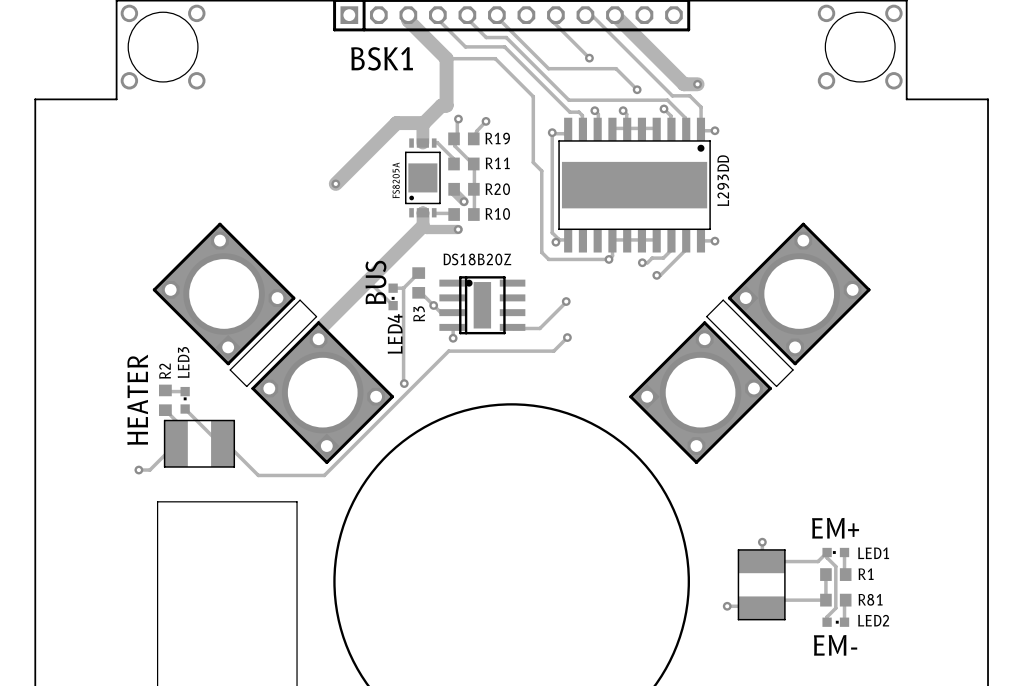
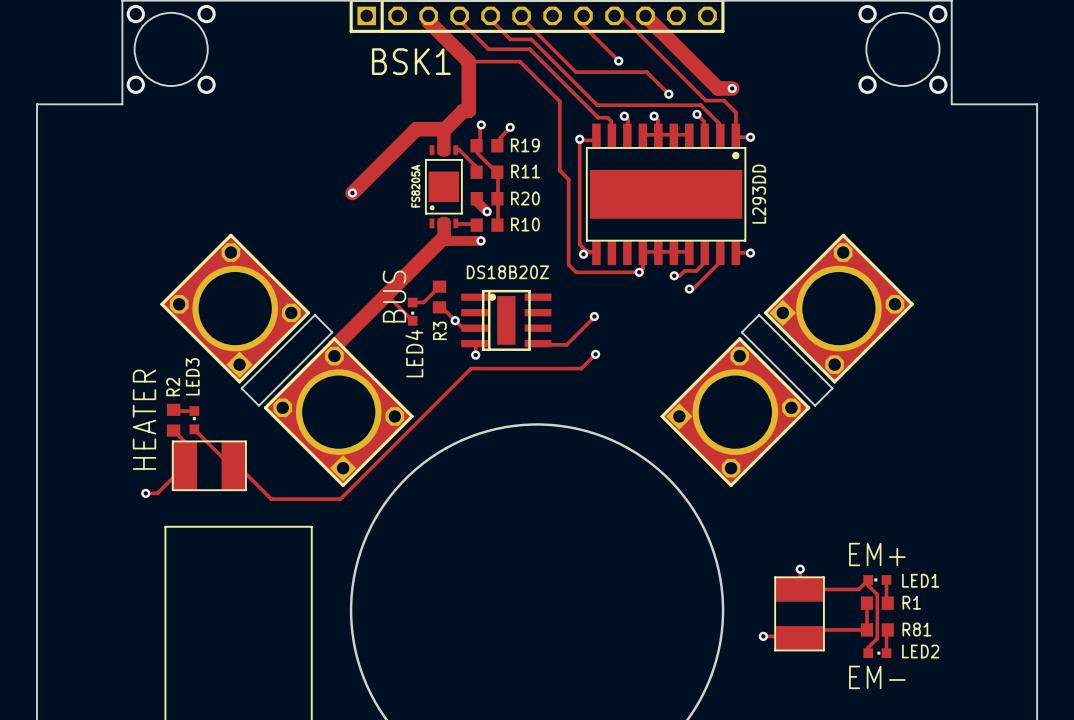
track: (403, 288) (404, 383) -> none
via: (404, 383) -> none

